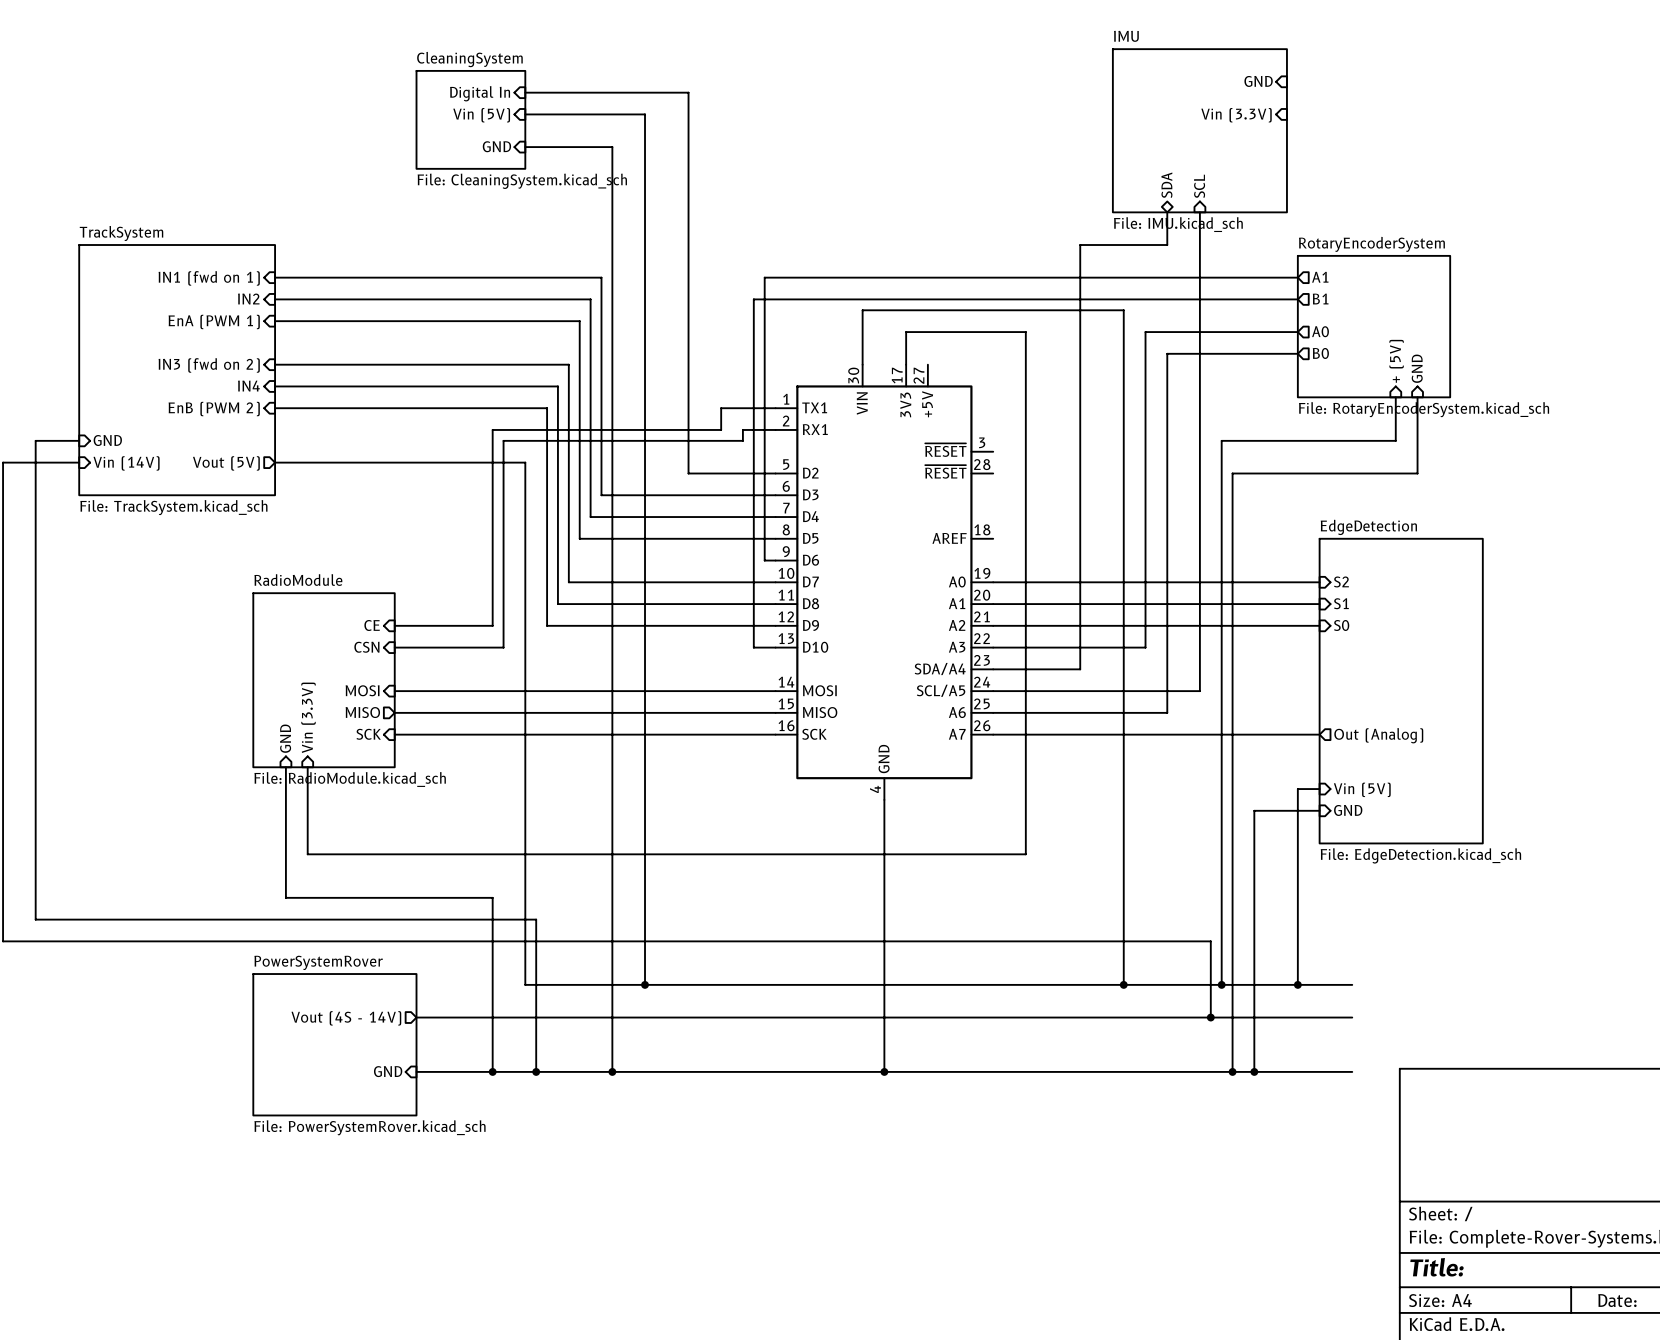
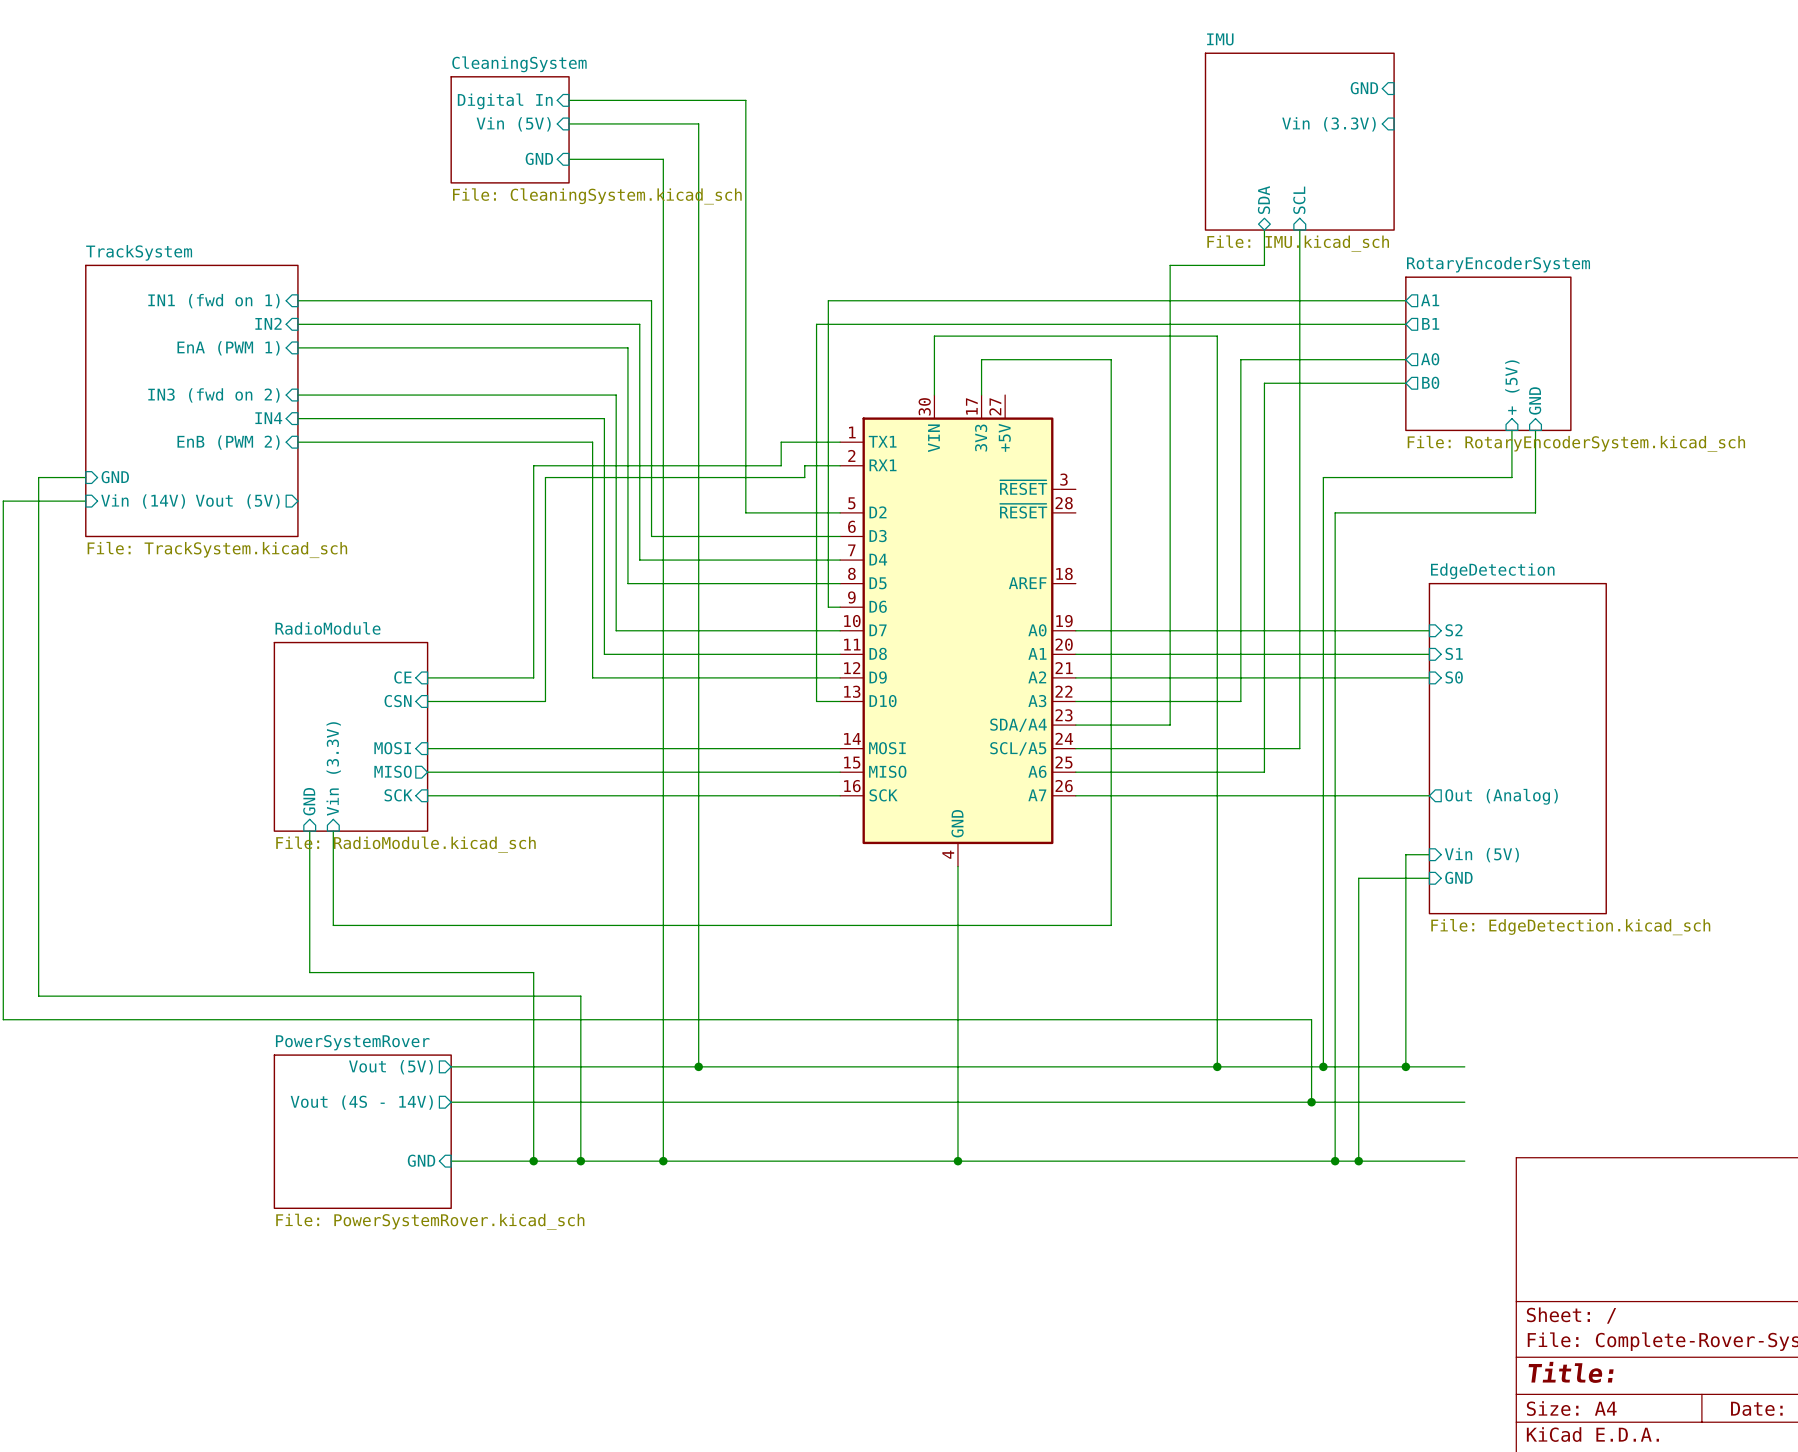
wire: (275, 462) (525, 462) (525, 984) -> (451, 1066) (569, 1066)
sheet pin: none -> Vout (5V) (390, 1067)

